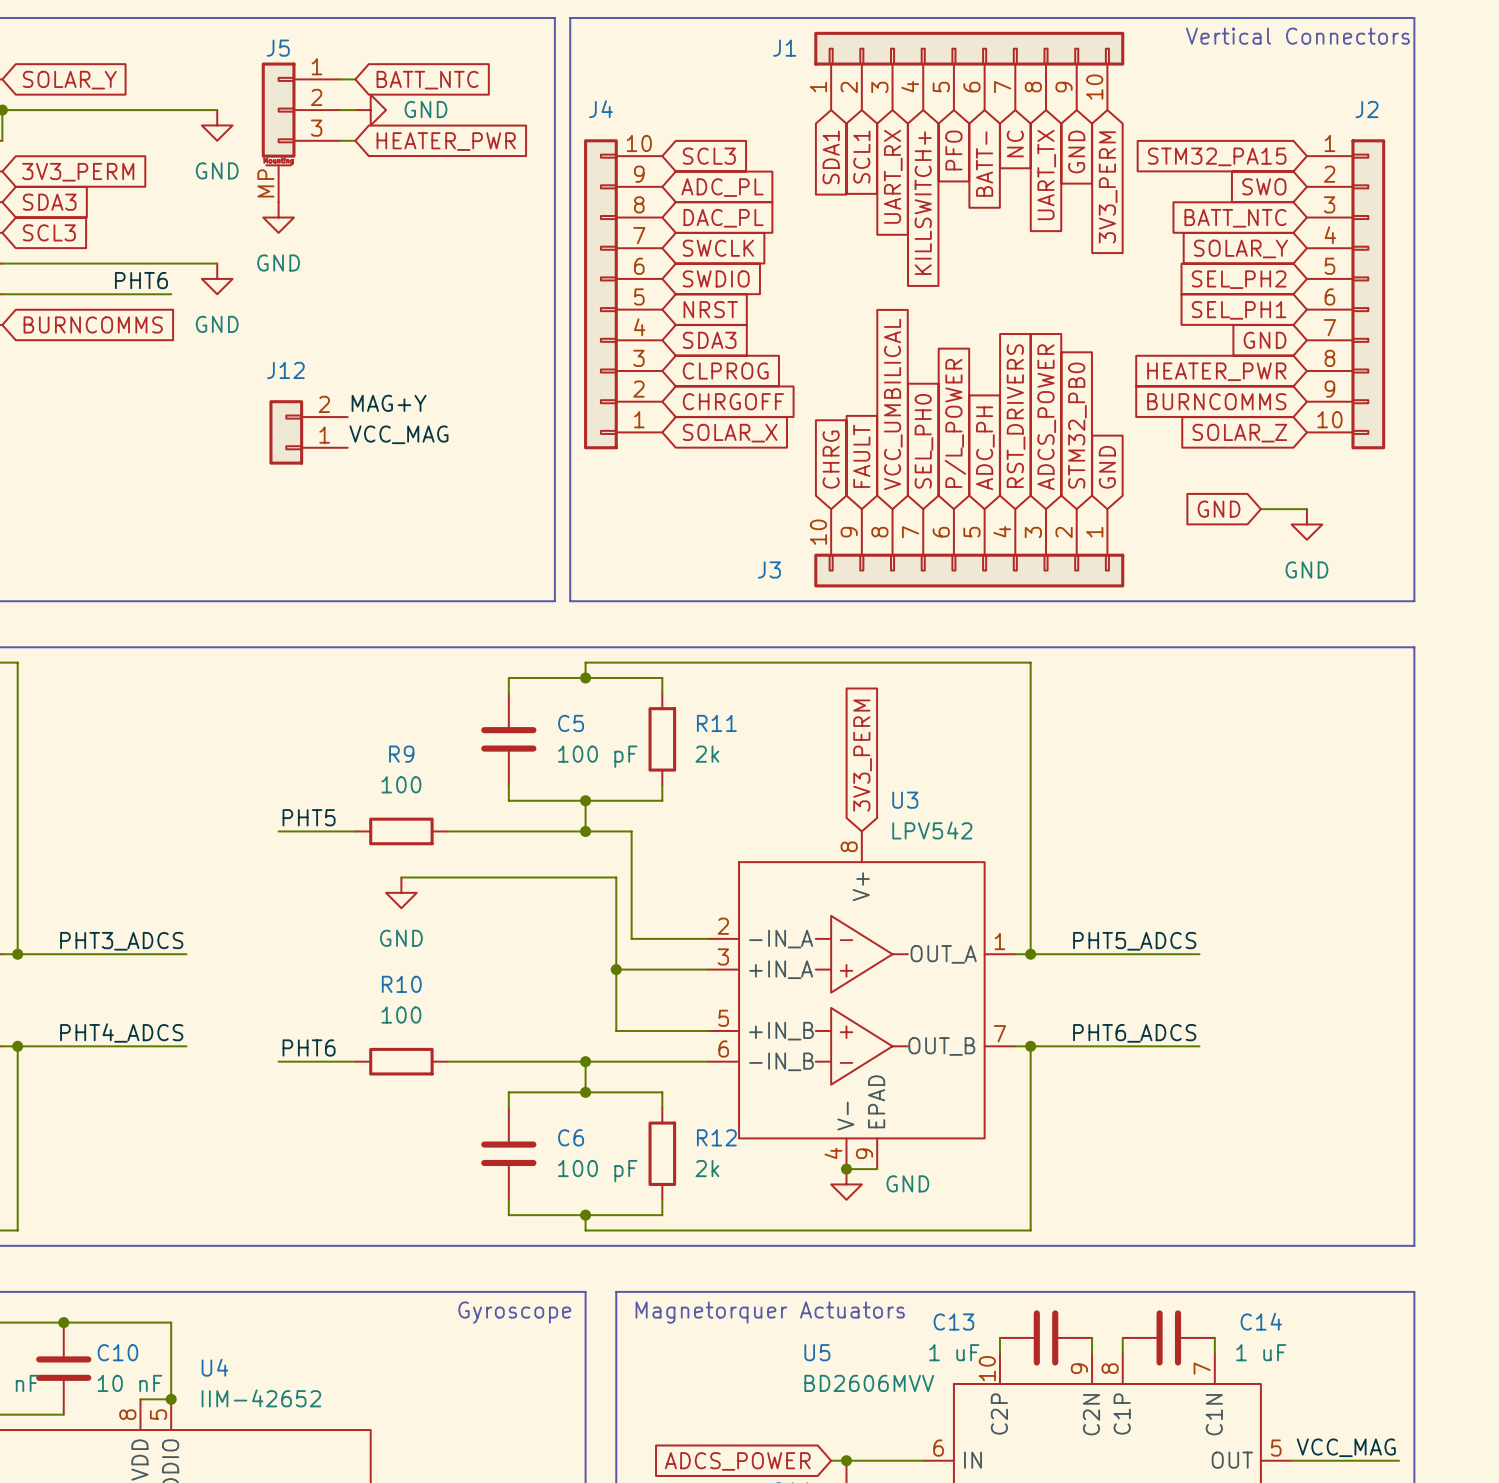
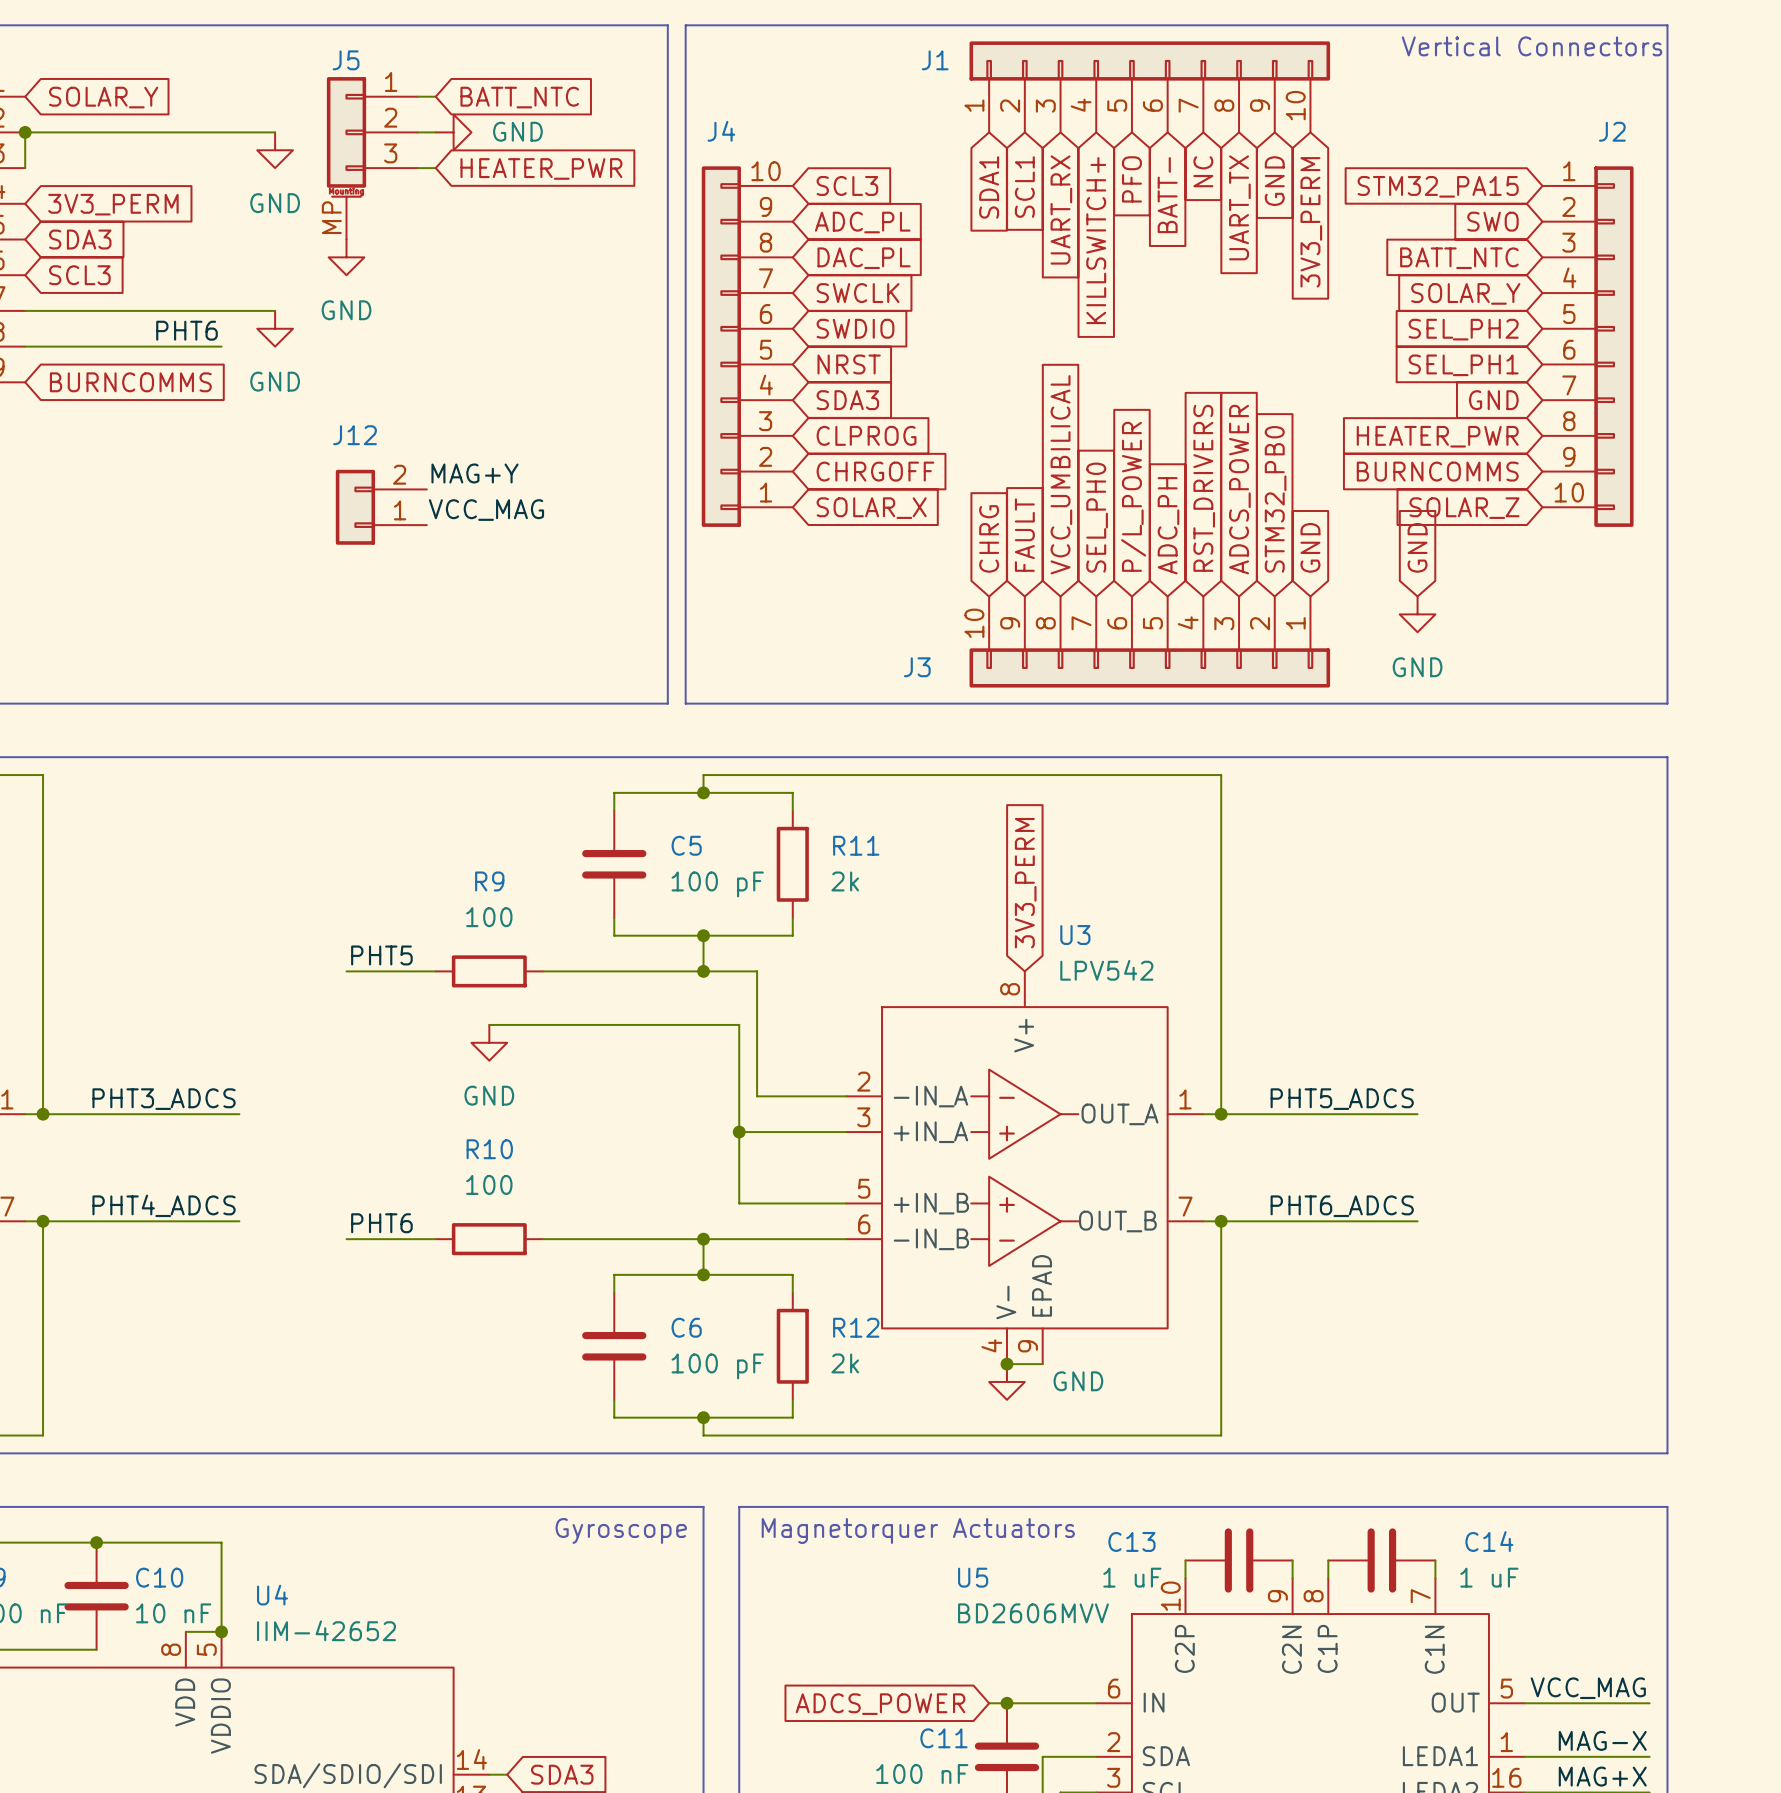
global label rotation: 0° (1219, 509) -> 90° clockwise (1417, 547)
wire: (1260, 509) (1306, 509) -> none
power symbol position: GND (1306, 524) -> GND (1417, 614)

